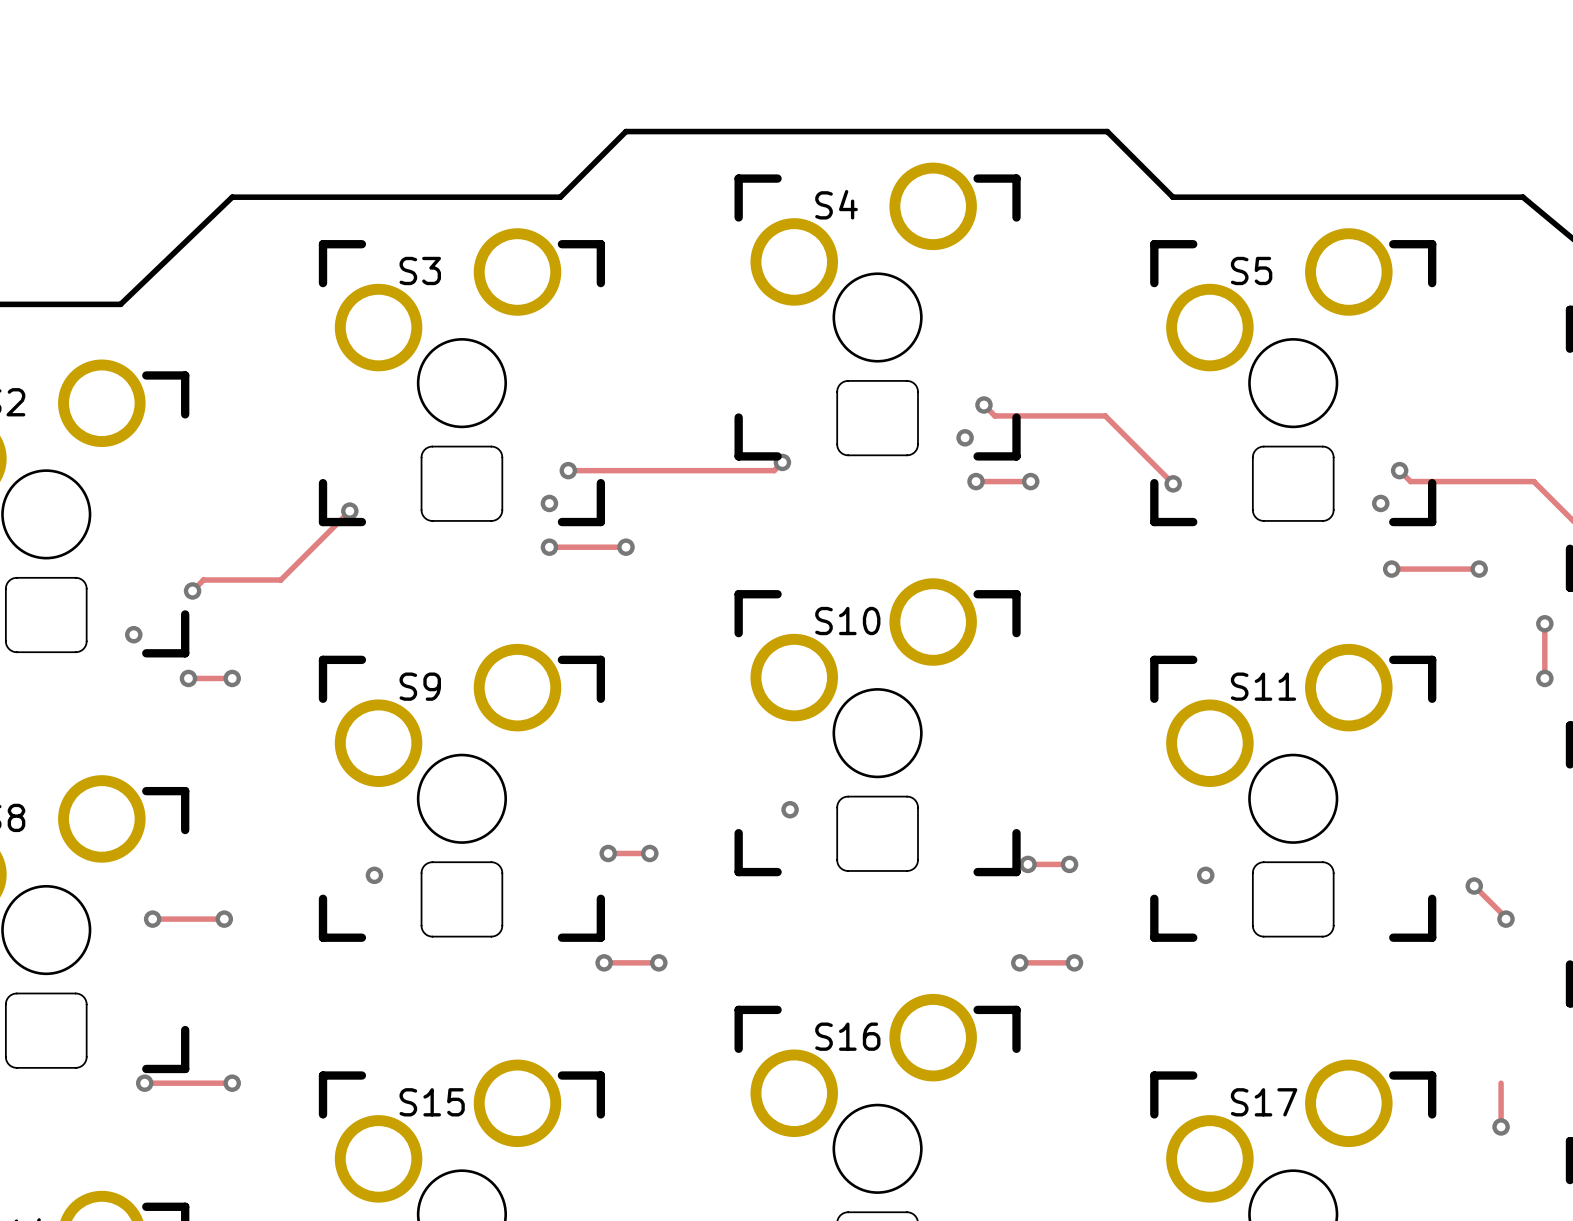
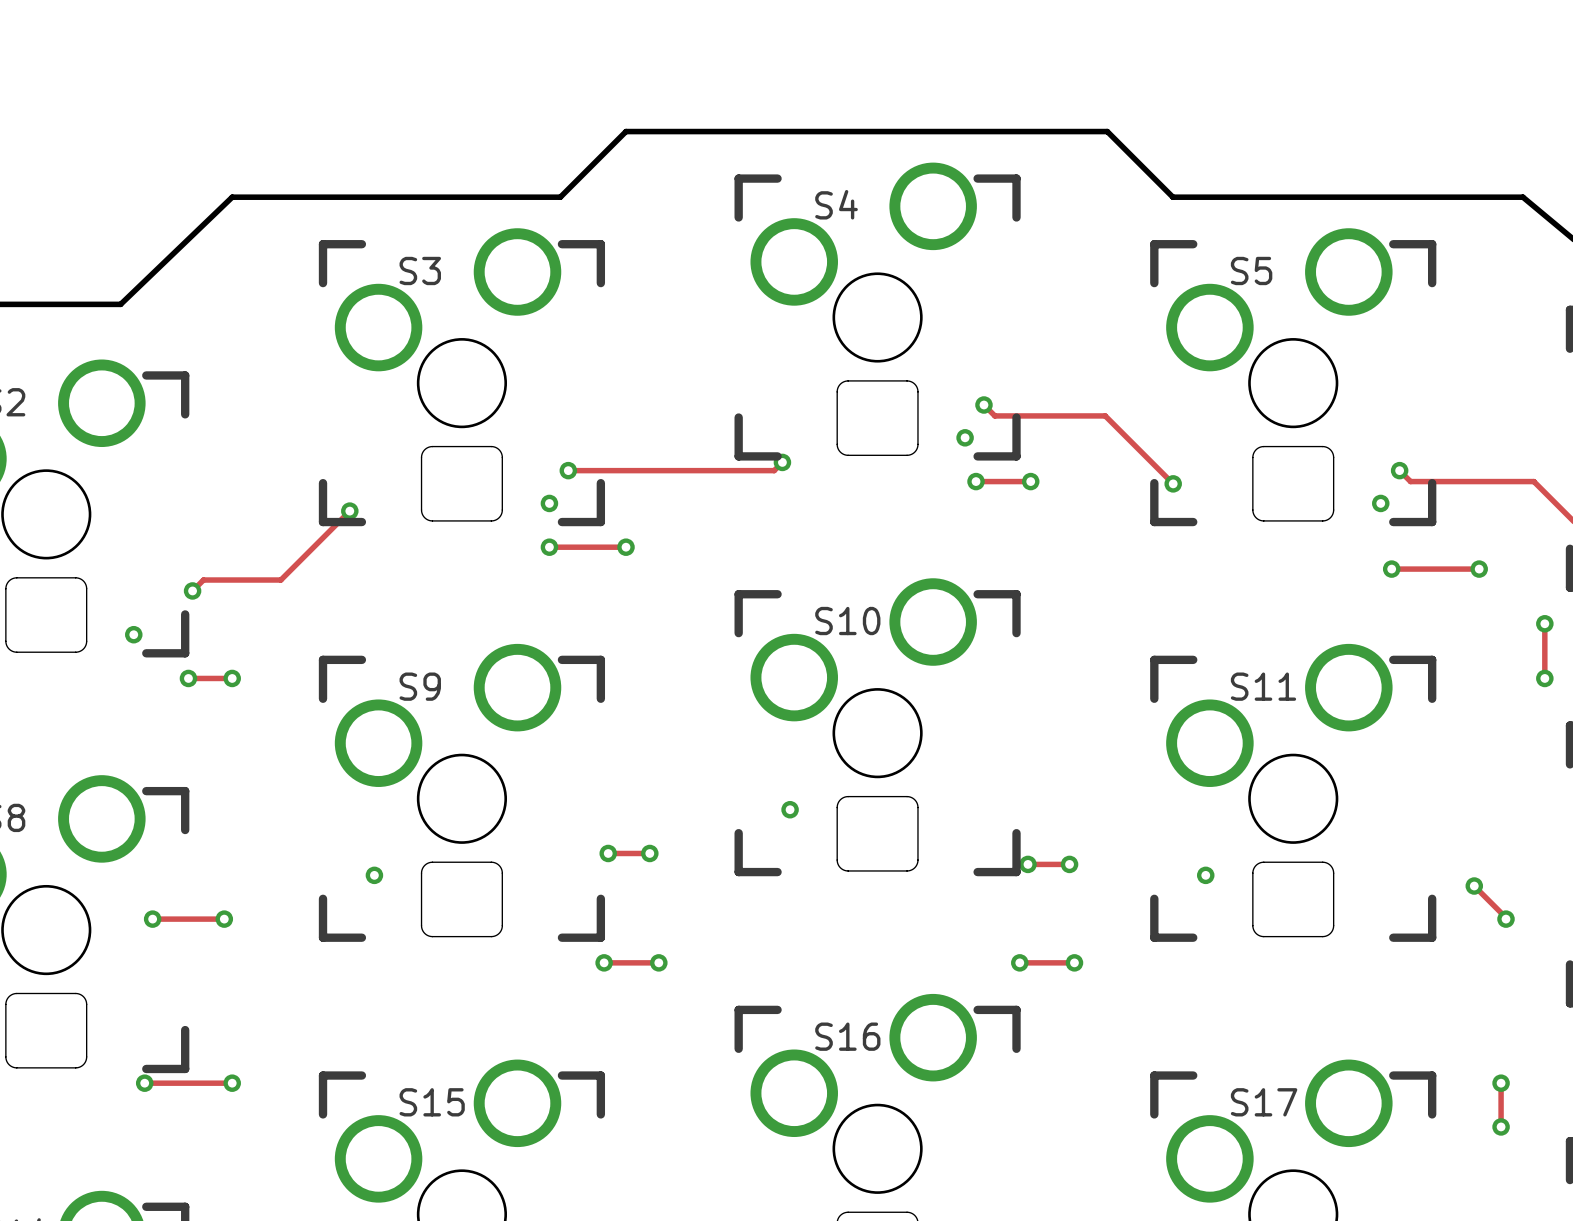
via: none -> (1501, 1083)

